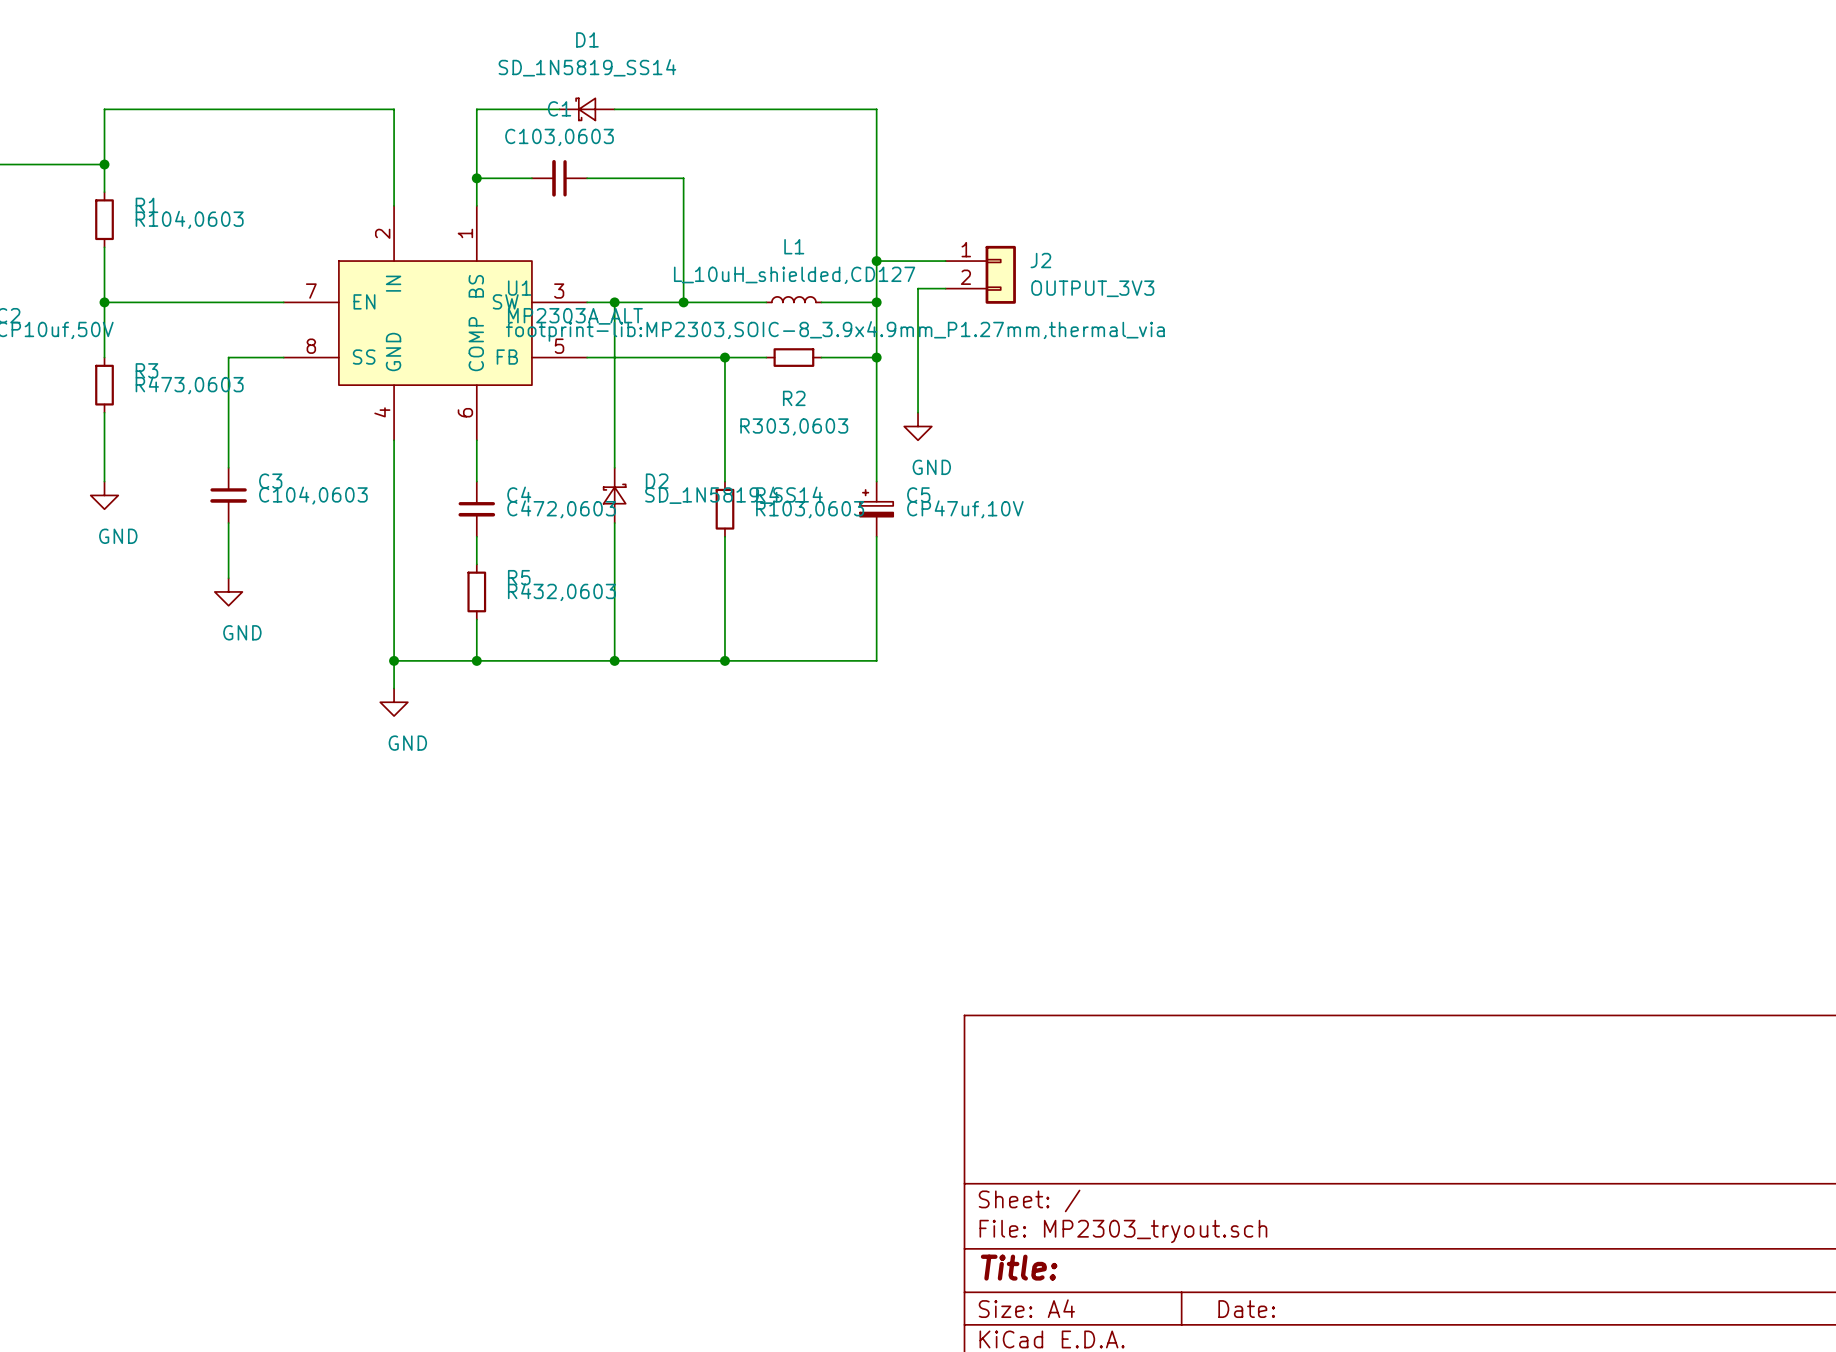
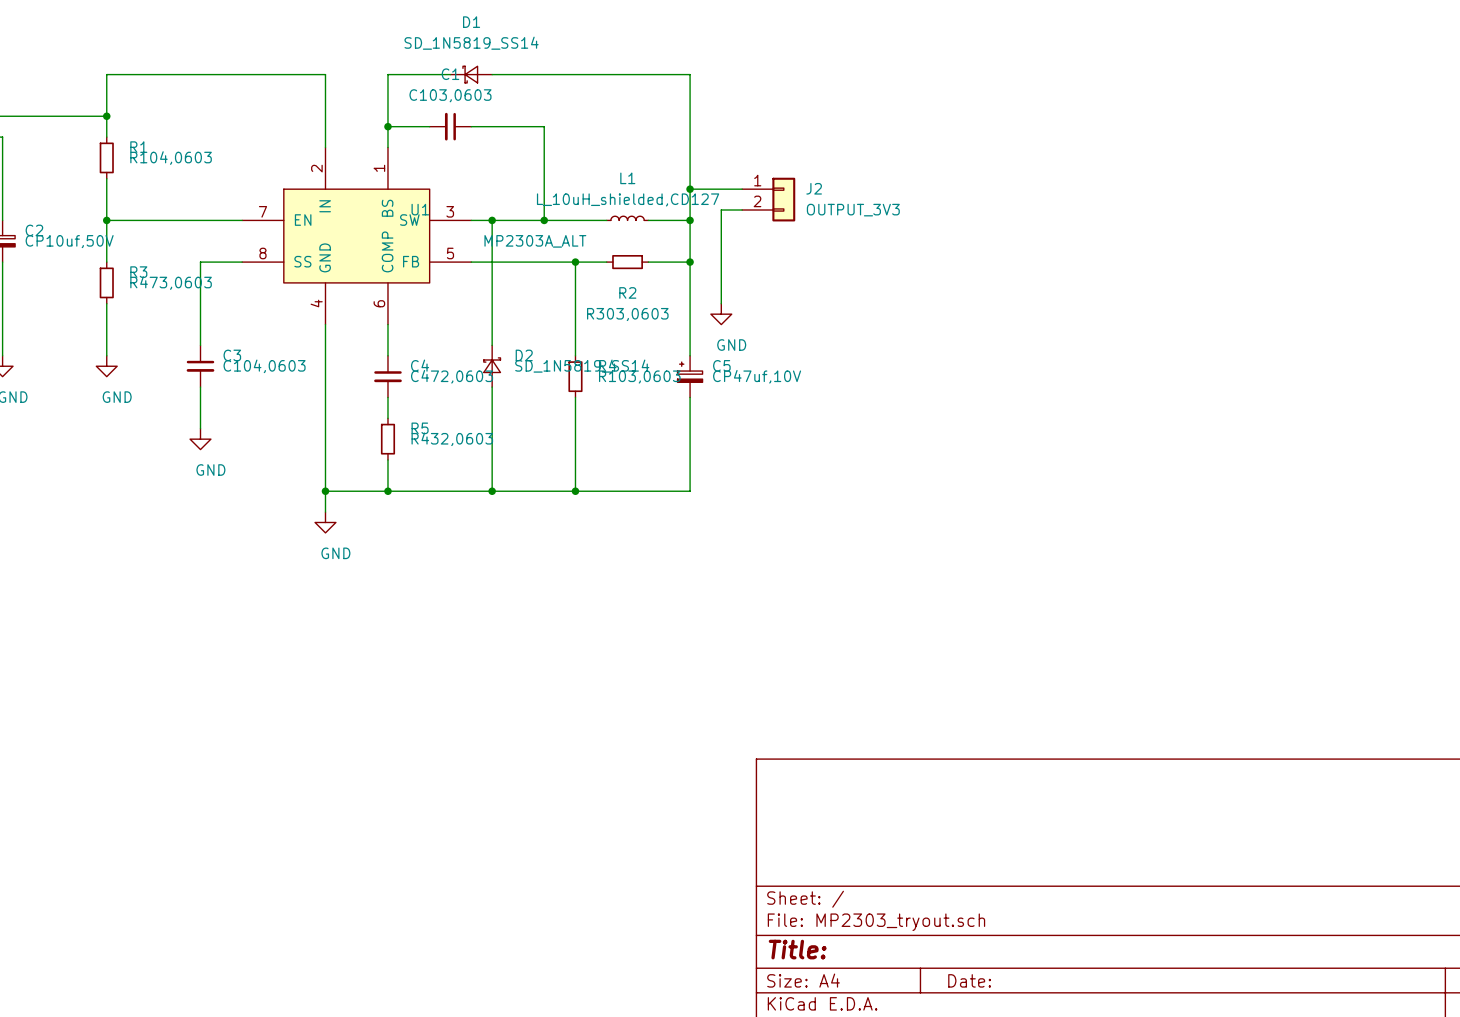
U1 value position: MP2303A_ALT (575, 316) -> MP2303A_ALT (535, 241)
U1 text: footprint-lib:MP2303,SOIC-8_3.9x4.9mm_P1.27mm,thermal_via (835, 331) -> none

